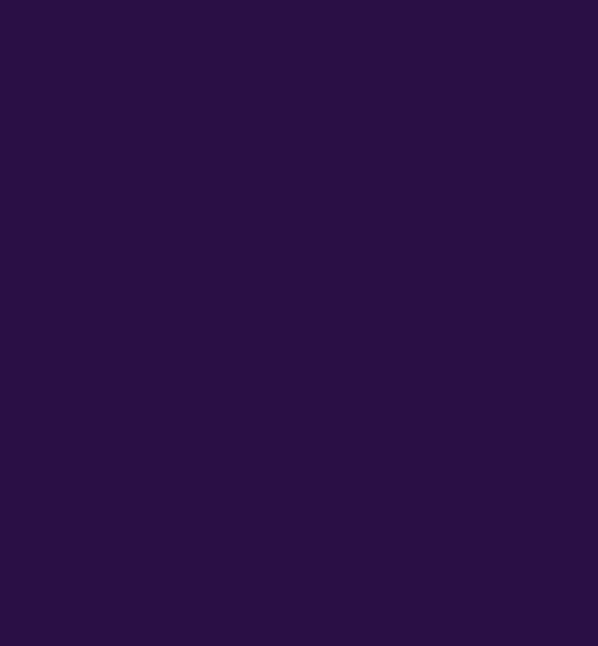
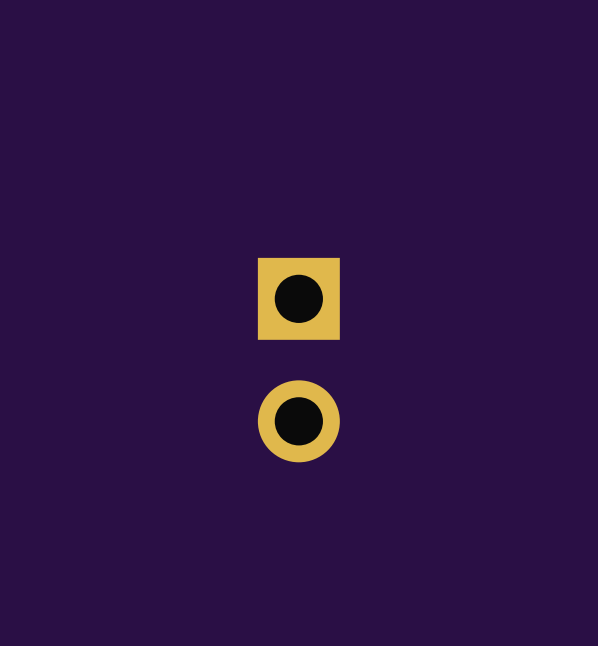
part: none -> (298, 360)

